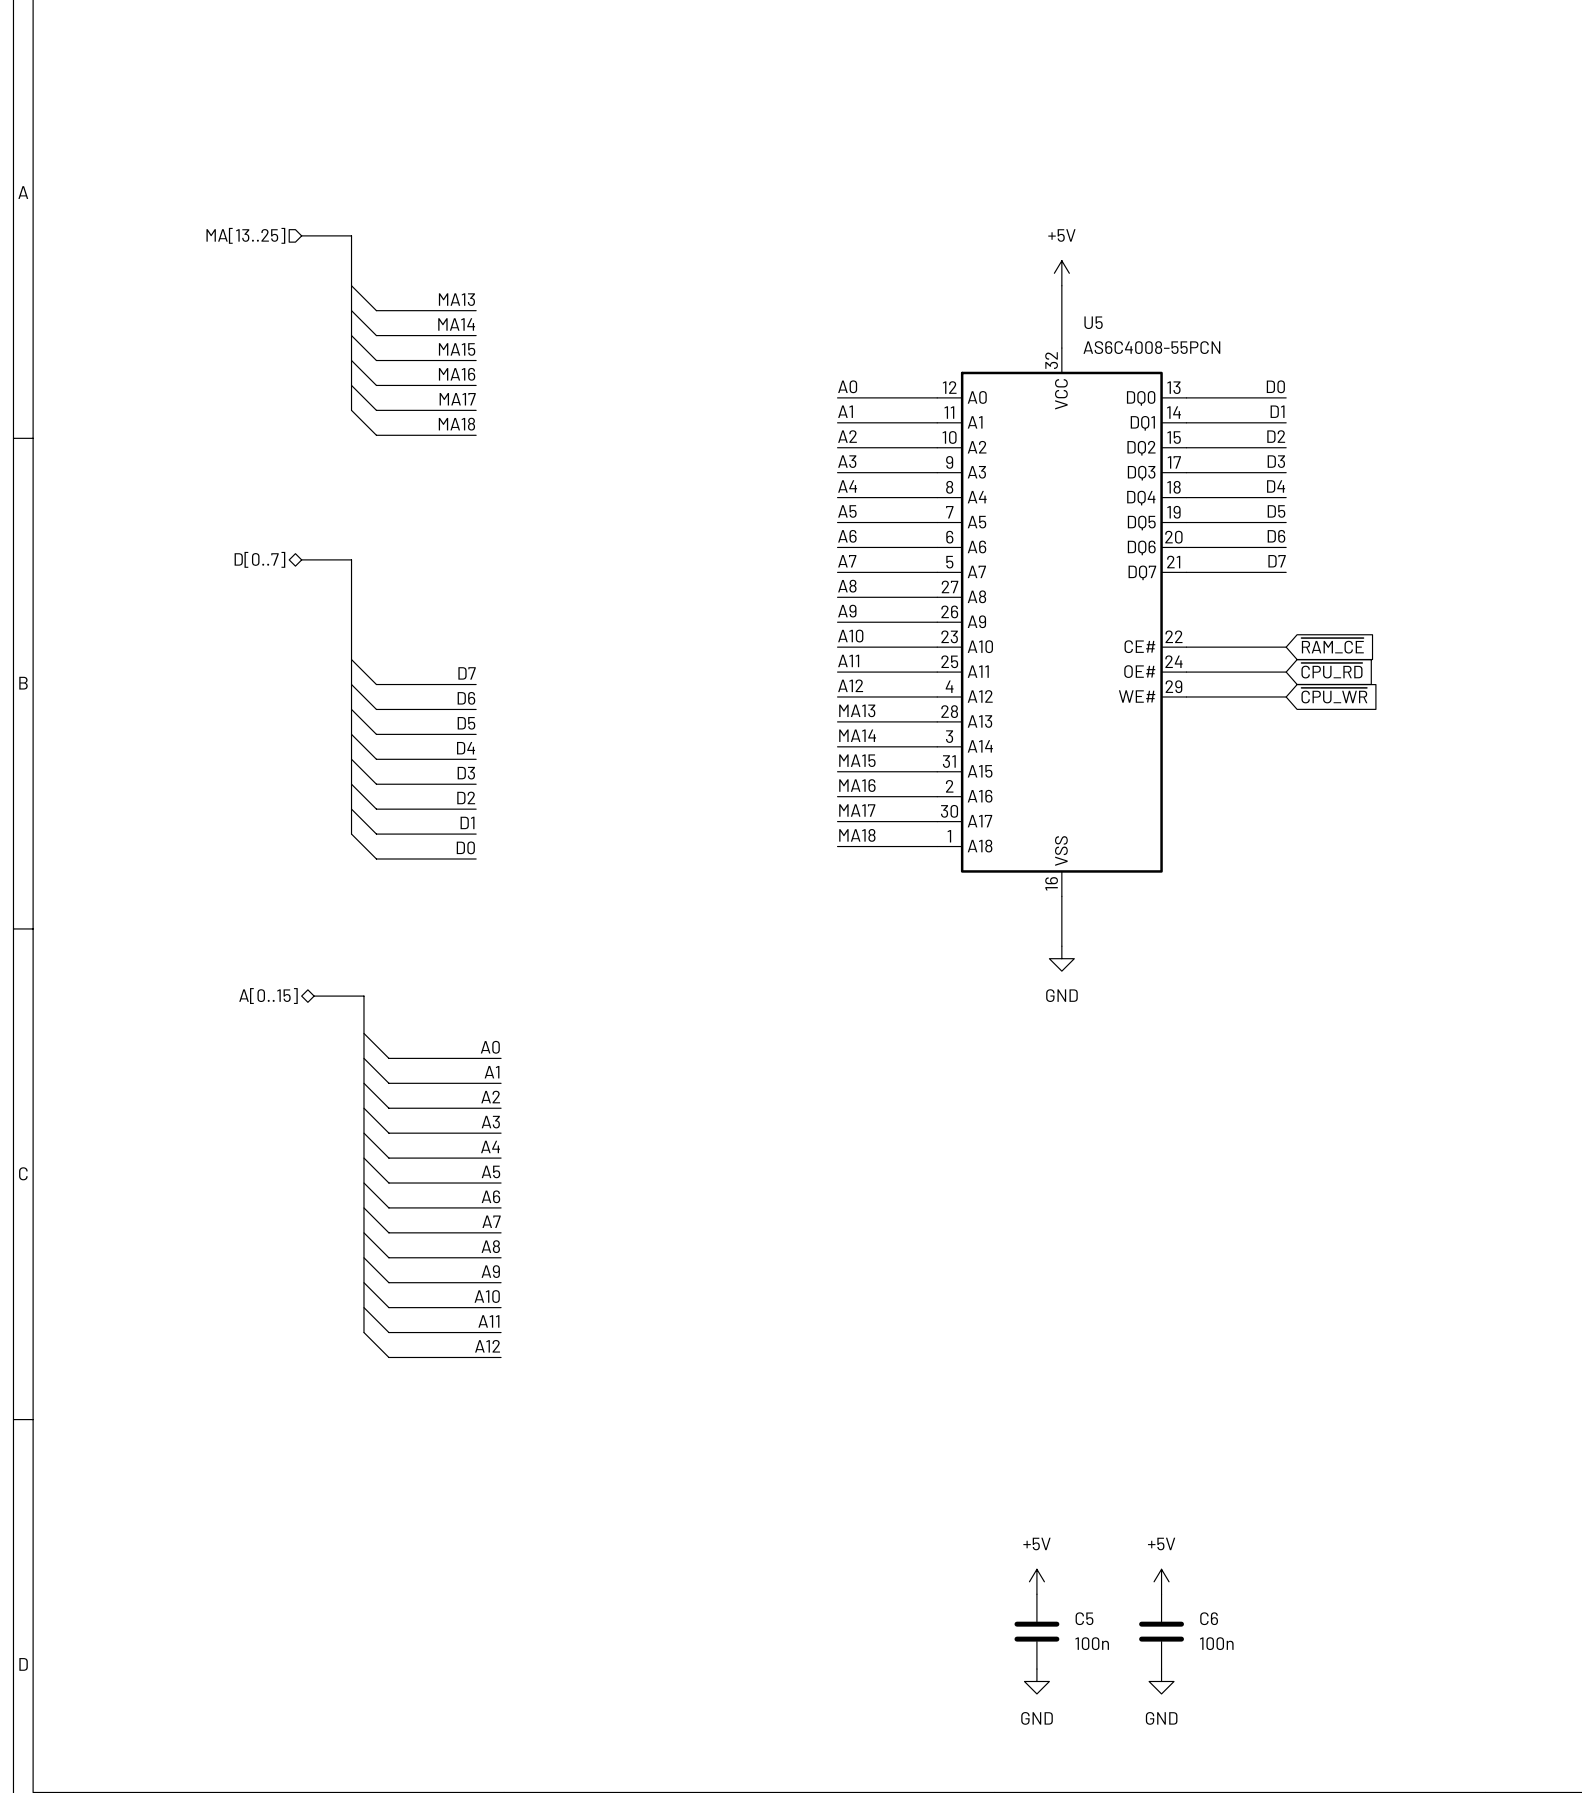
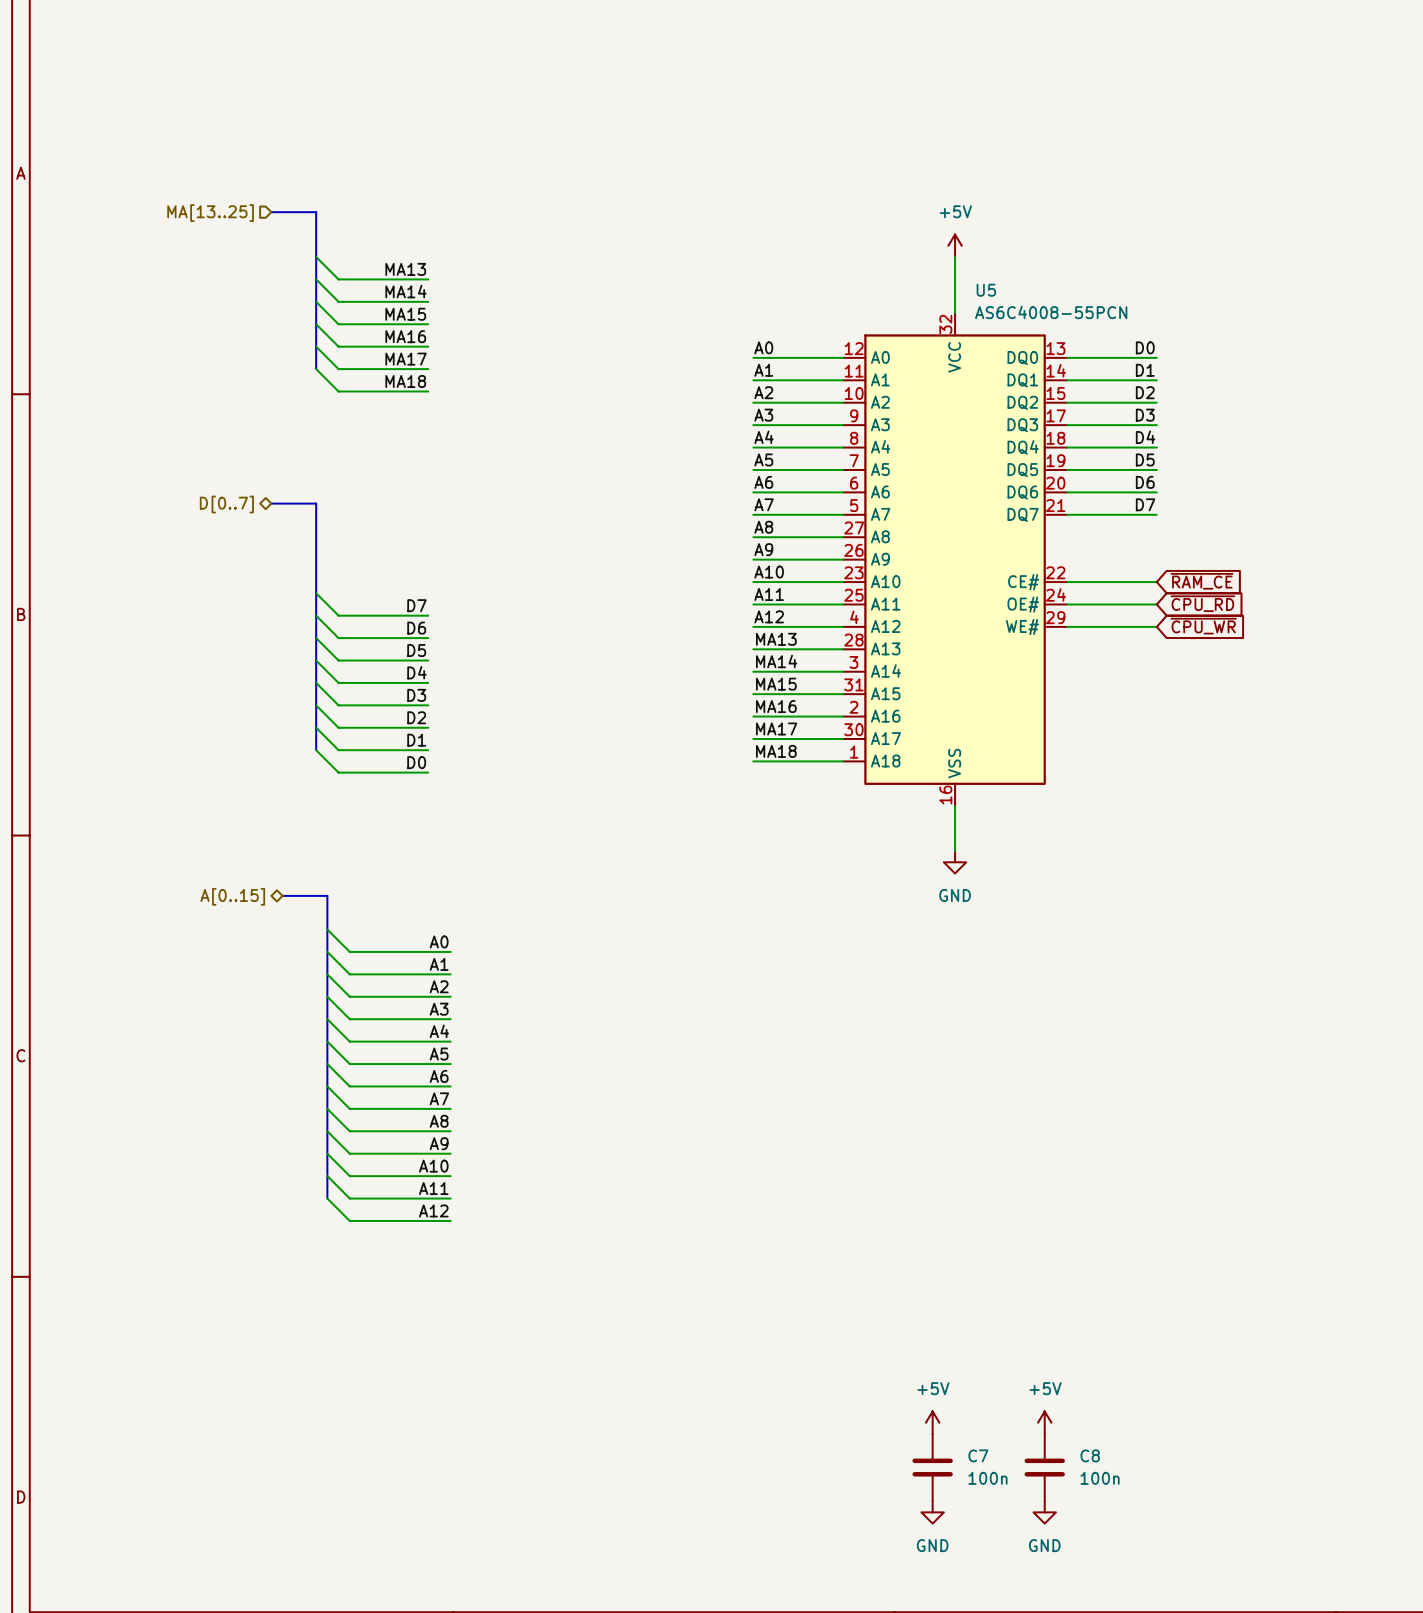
C5 name: C5 (1084, 1618) -> C7 (978, 1455)
C6 name: C6 (1209, 1618) -> C8 (1090, 1455)

